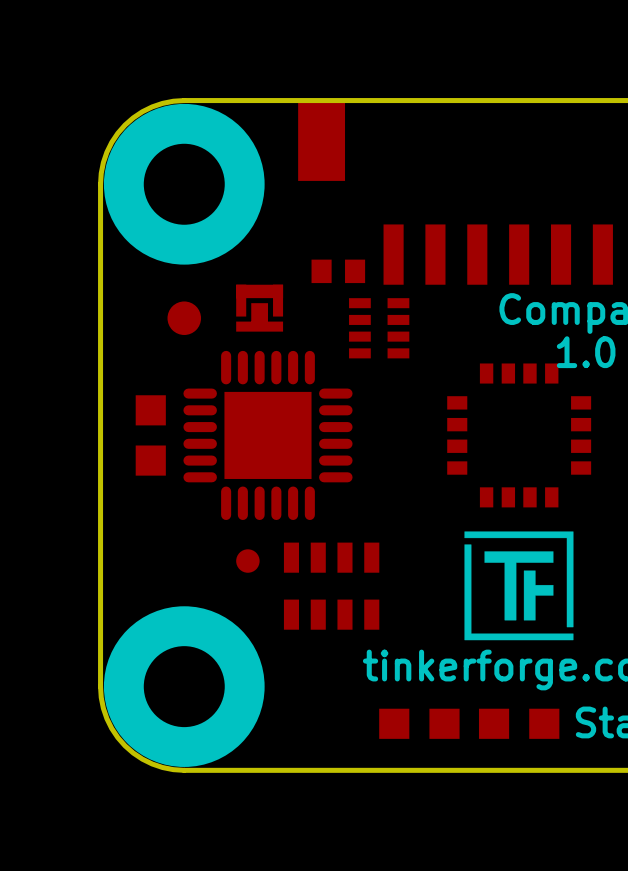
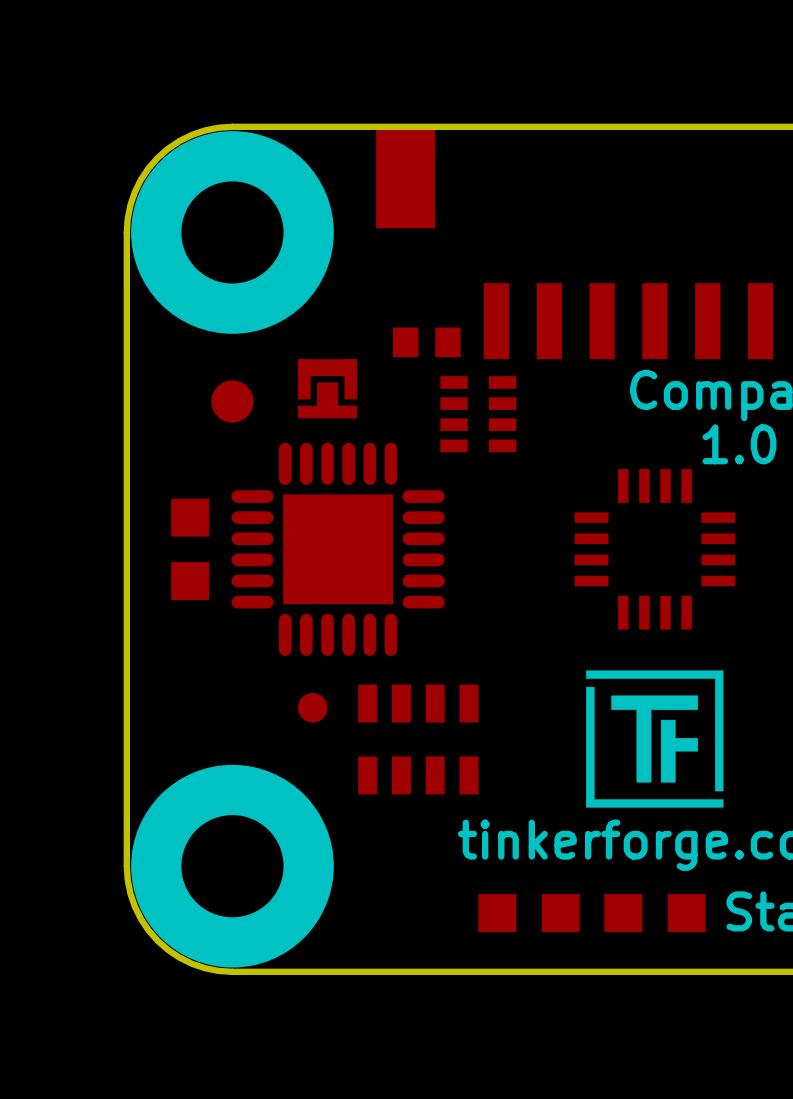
part footprint: [447, 363, 592, 508] -> [574, 469, 736, 630]

